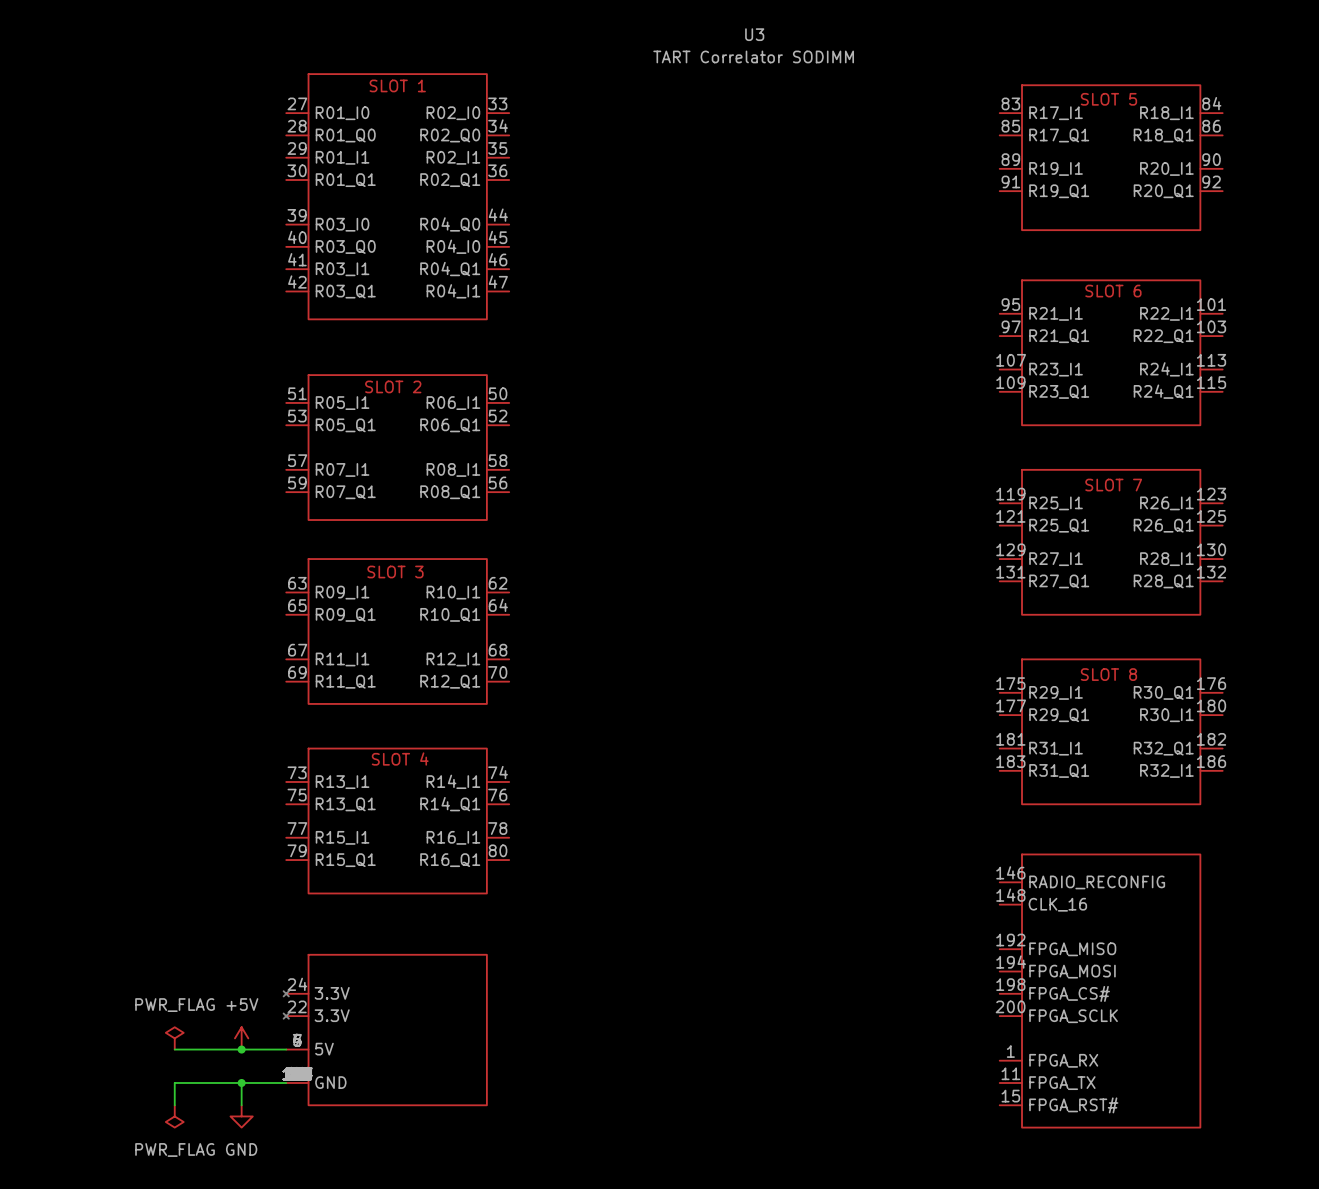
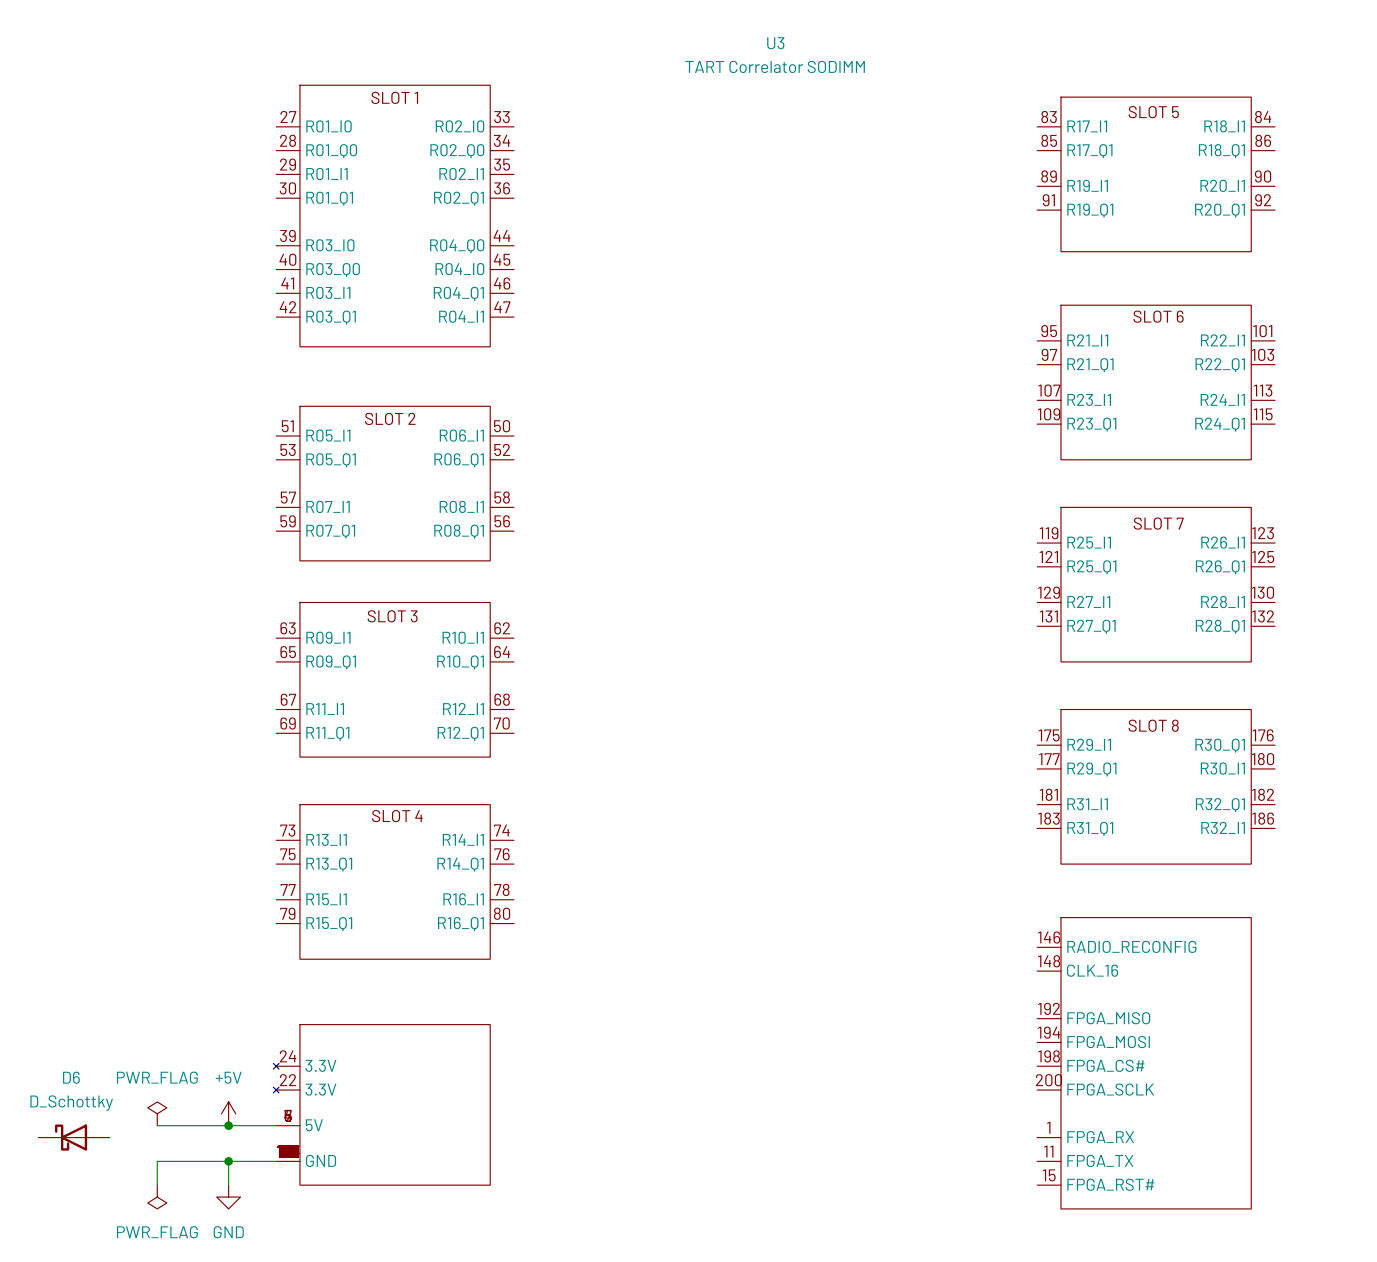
D6: none -> D_Schottky (74, 1137)

